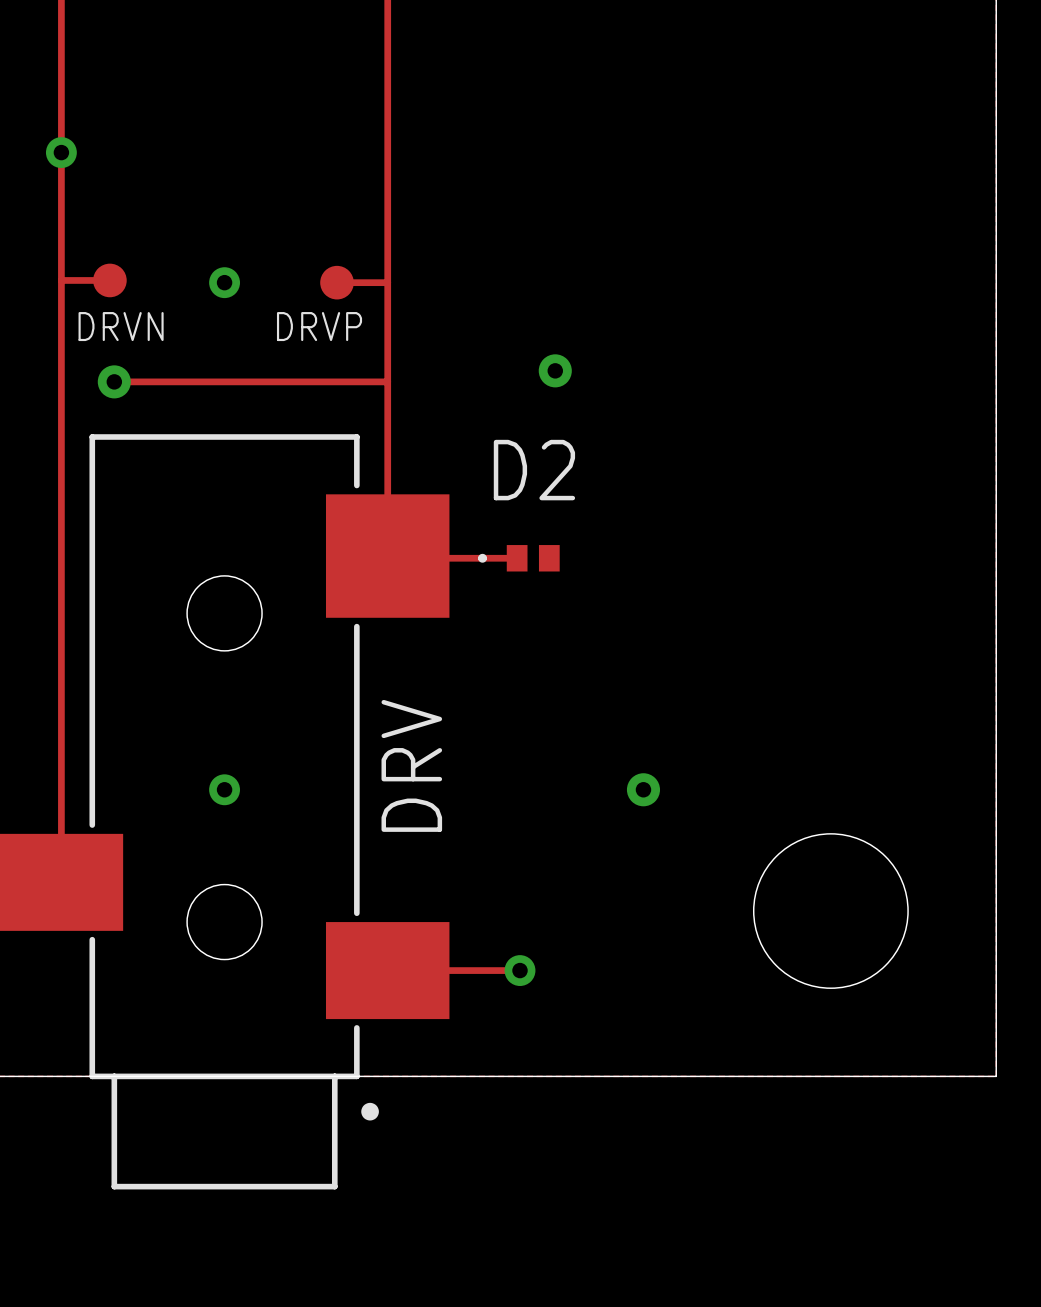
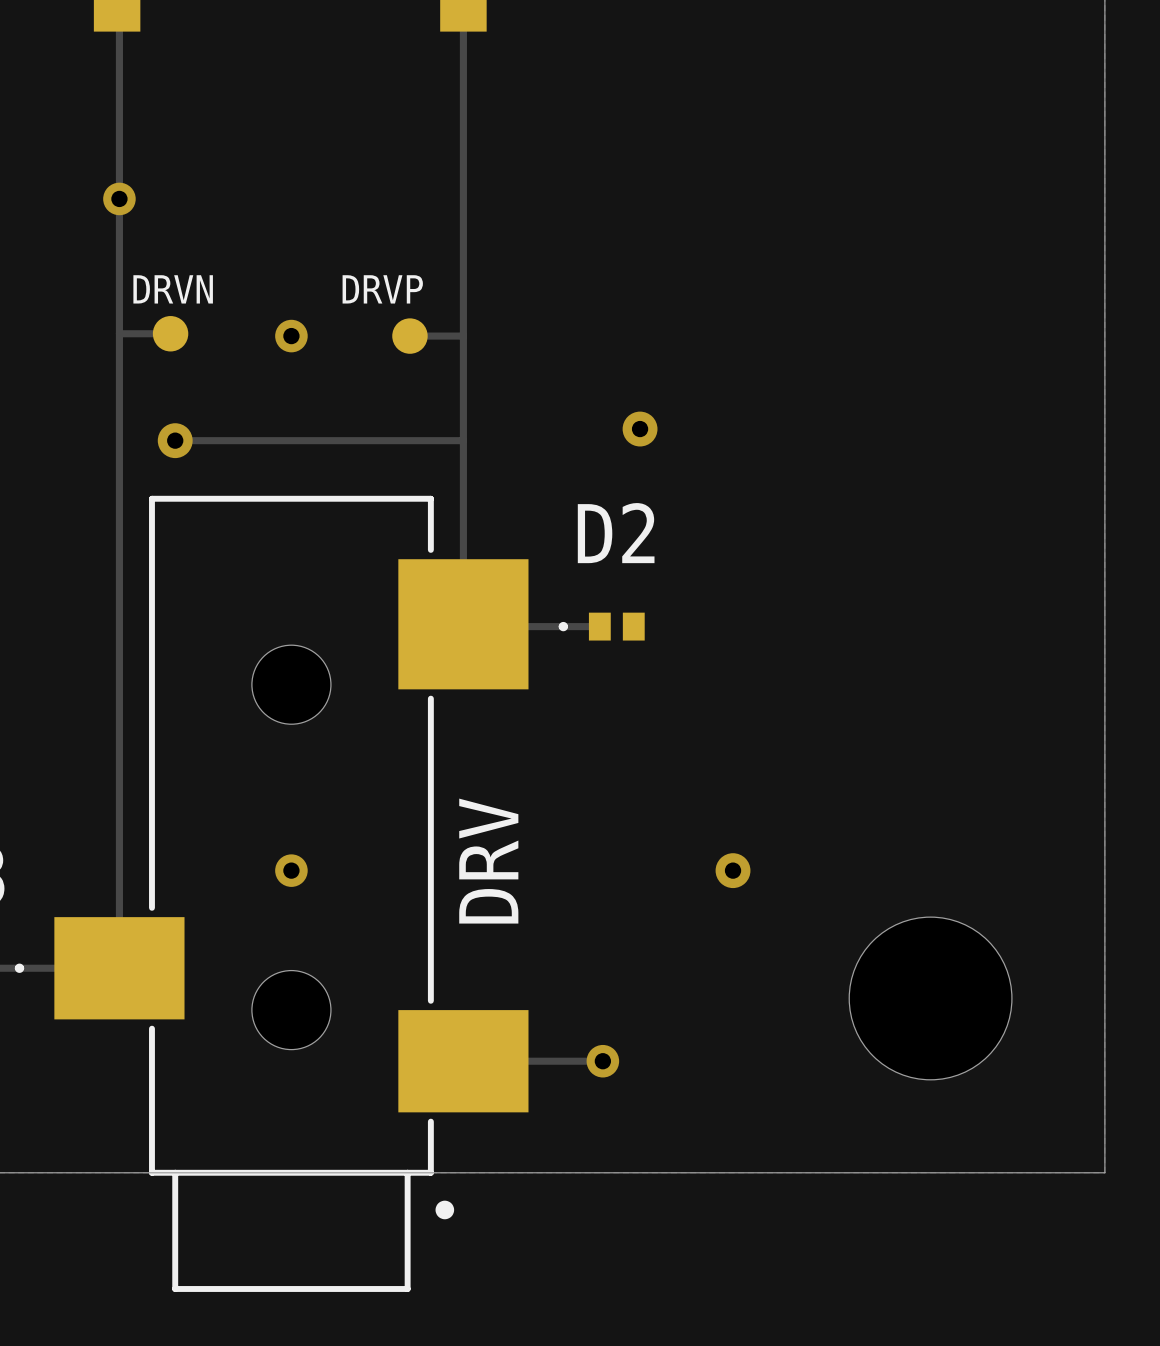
text position: DRVN (121, 326) -> DRVN (173, 289)
text position: DRVP (319, 326) -> DRVP (382, 289)

